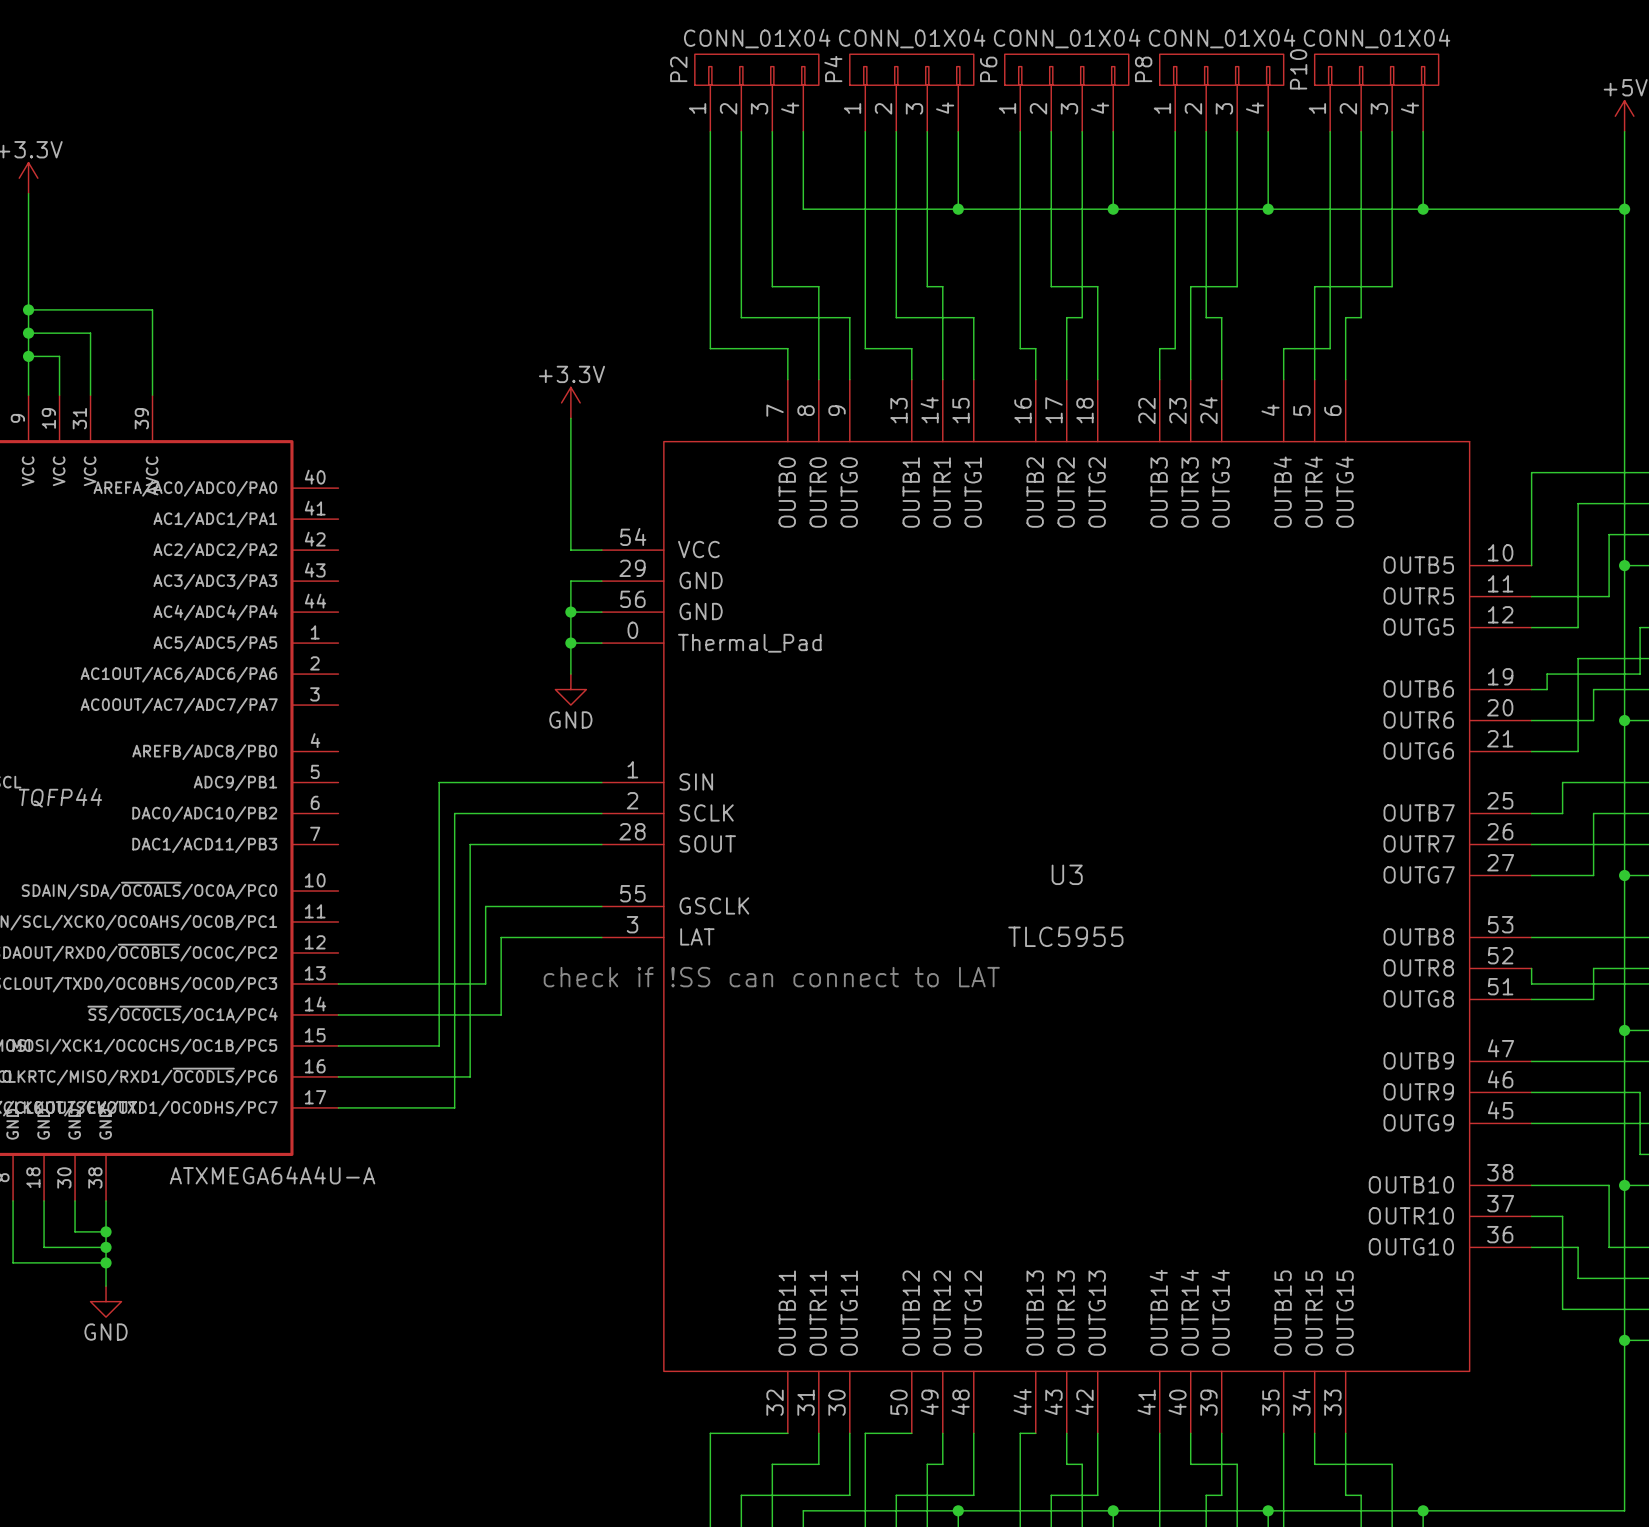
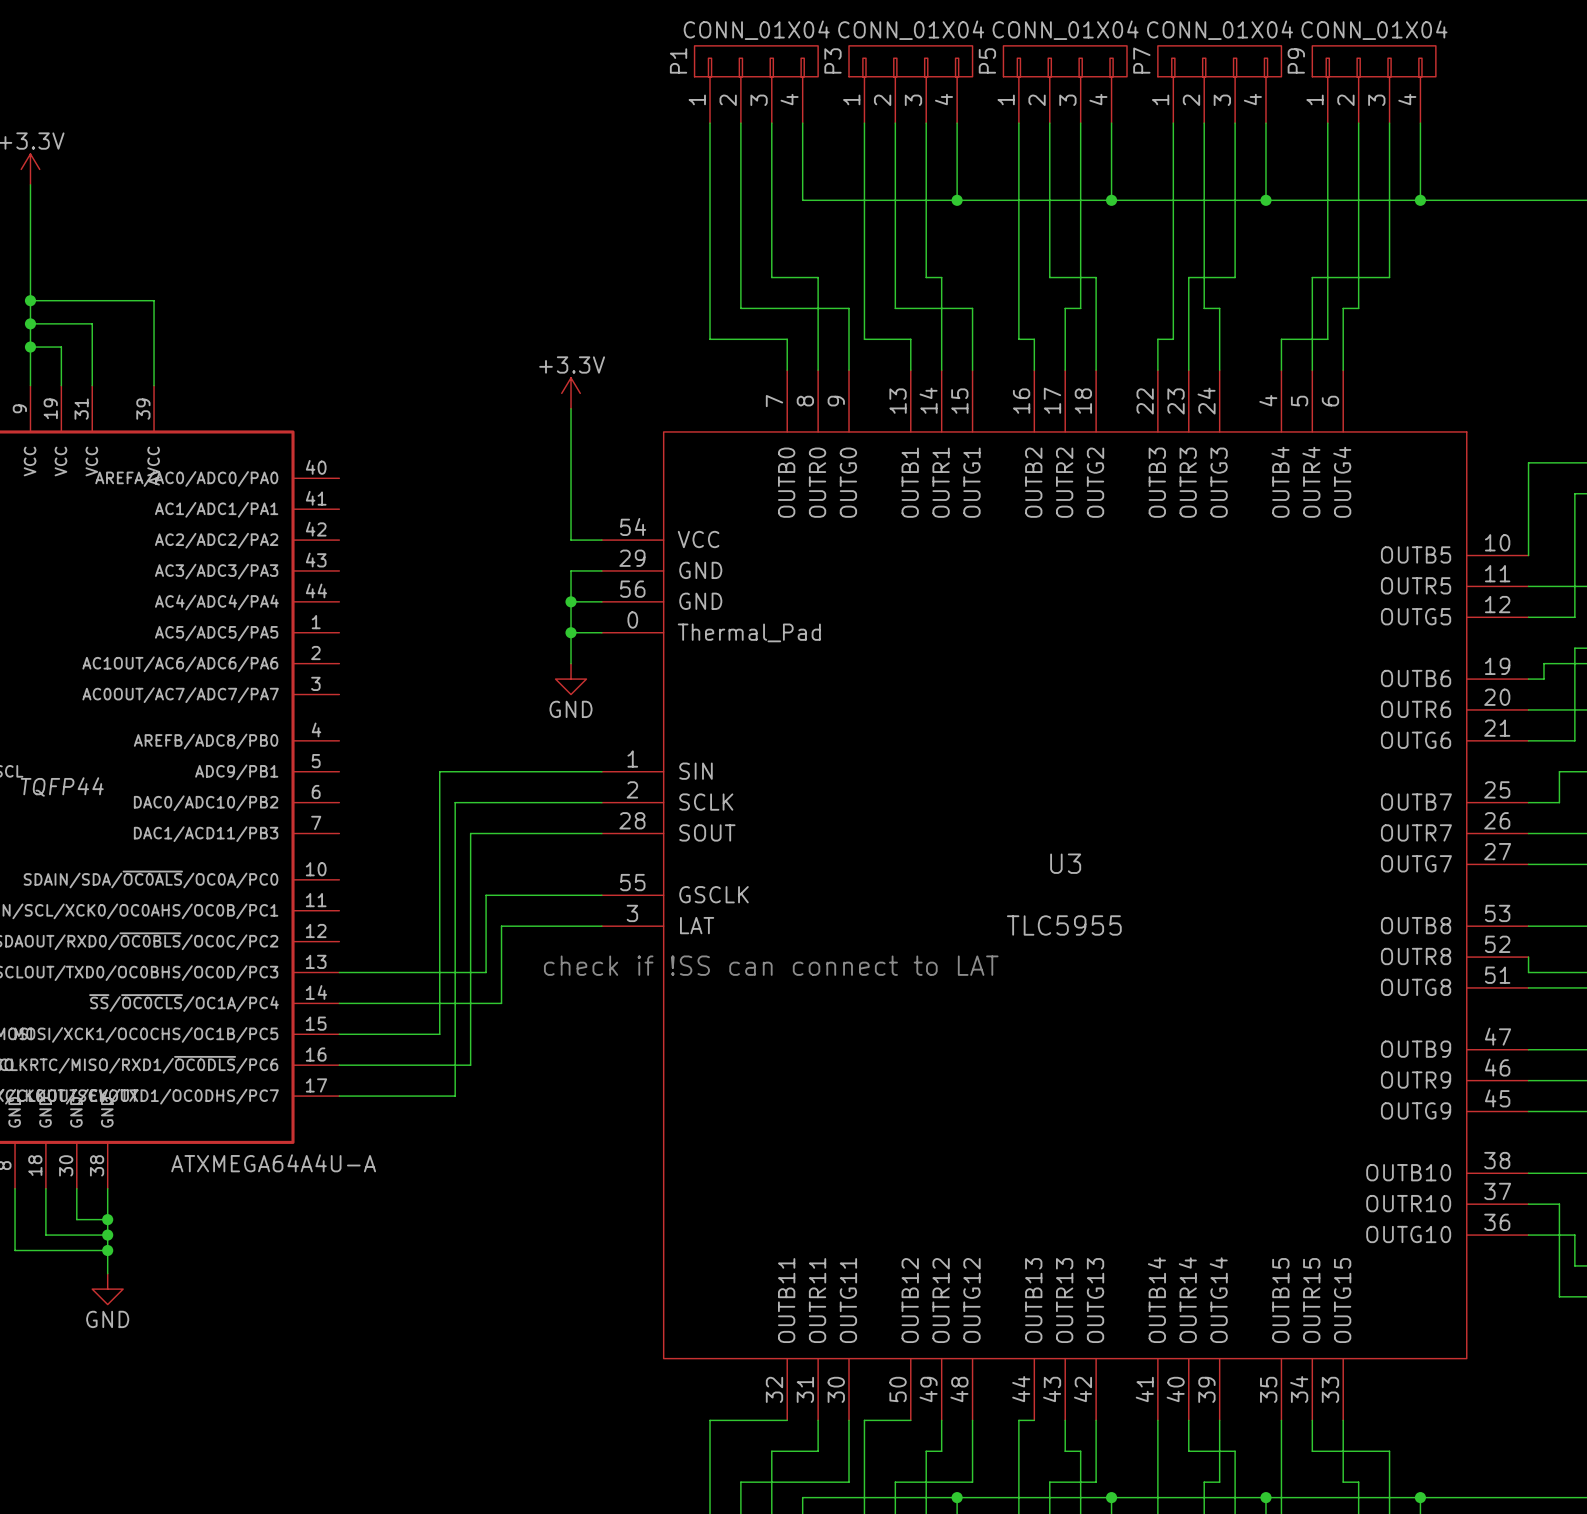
P2 name: P2 (678, 69) -> P1 (678, 60)
P4 name: P4 (833, 69) -> P3 (832, 60)
P6 name: P6 (988, 69) -> P5 (987, 60)
P8 name: P8 (1143, 69) -> P7 (1141, 60)
P10 name: P10 (1298, 69) -> P9 (1296, 60)

